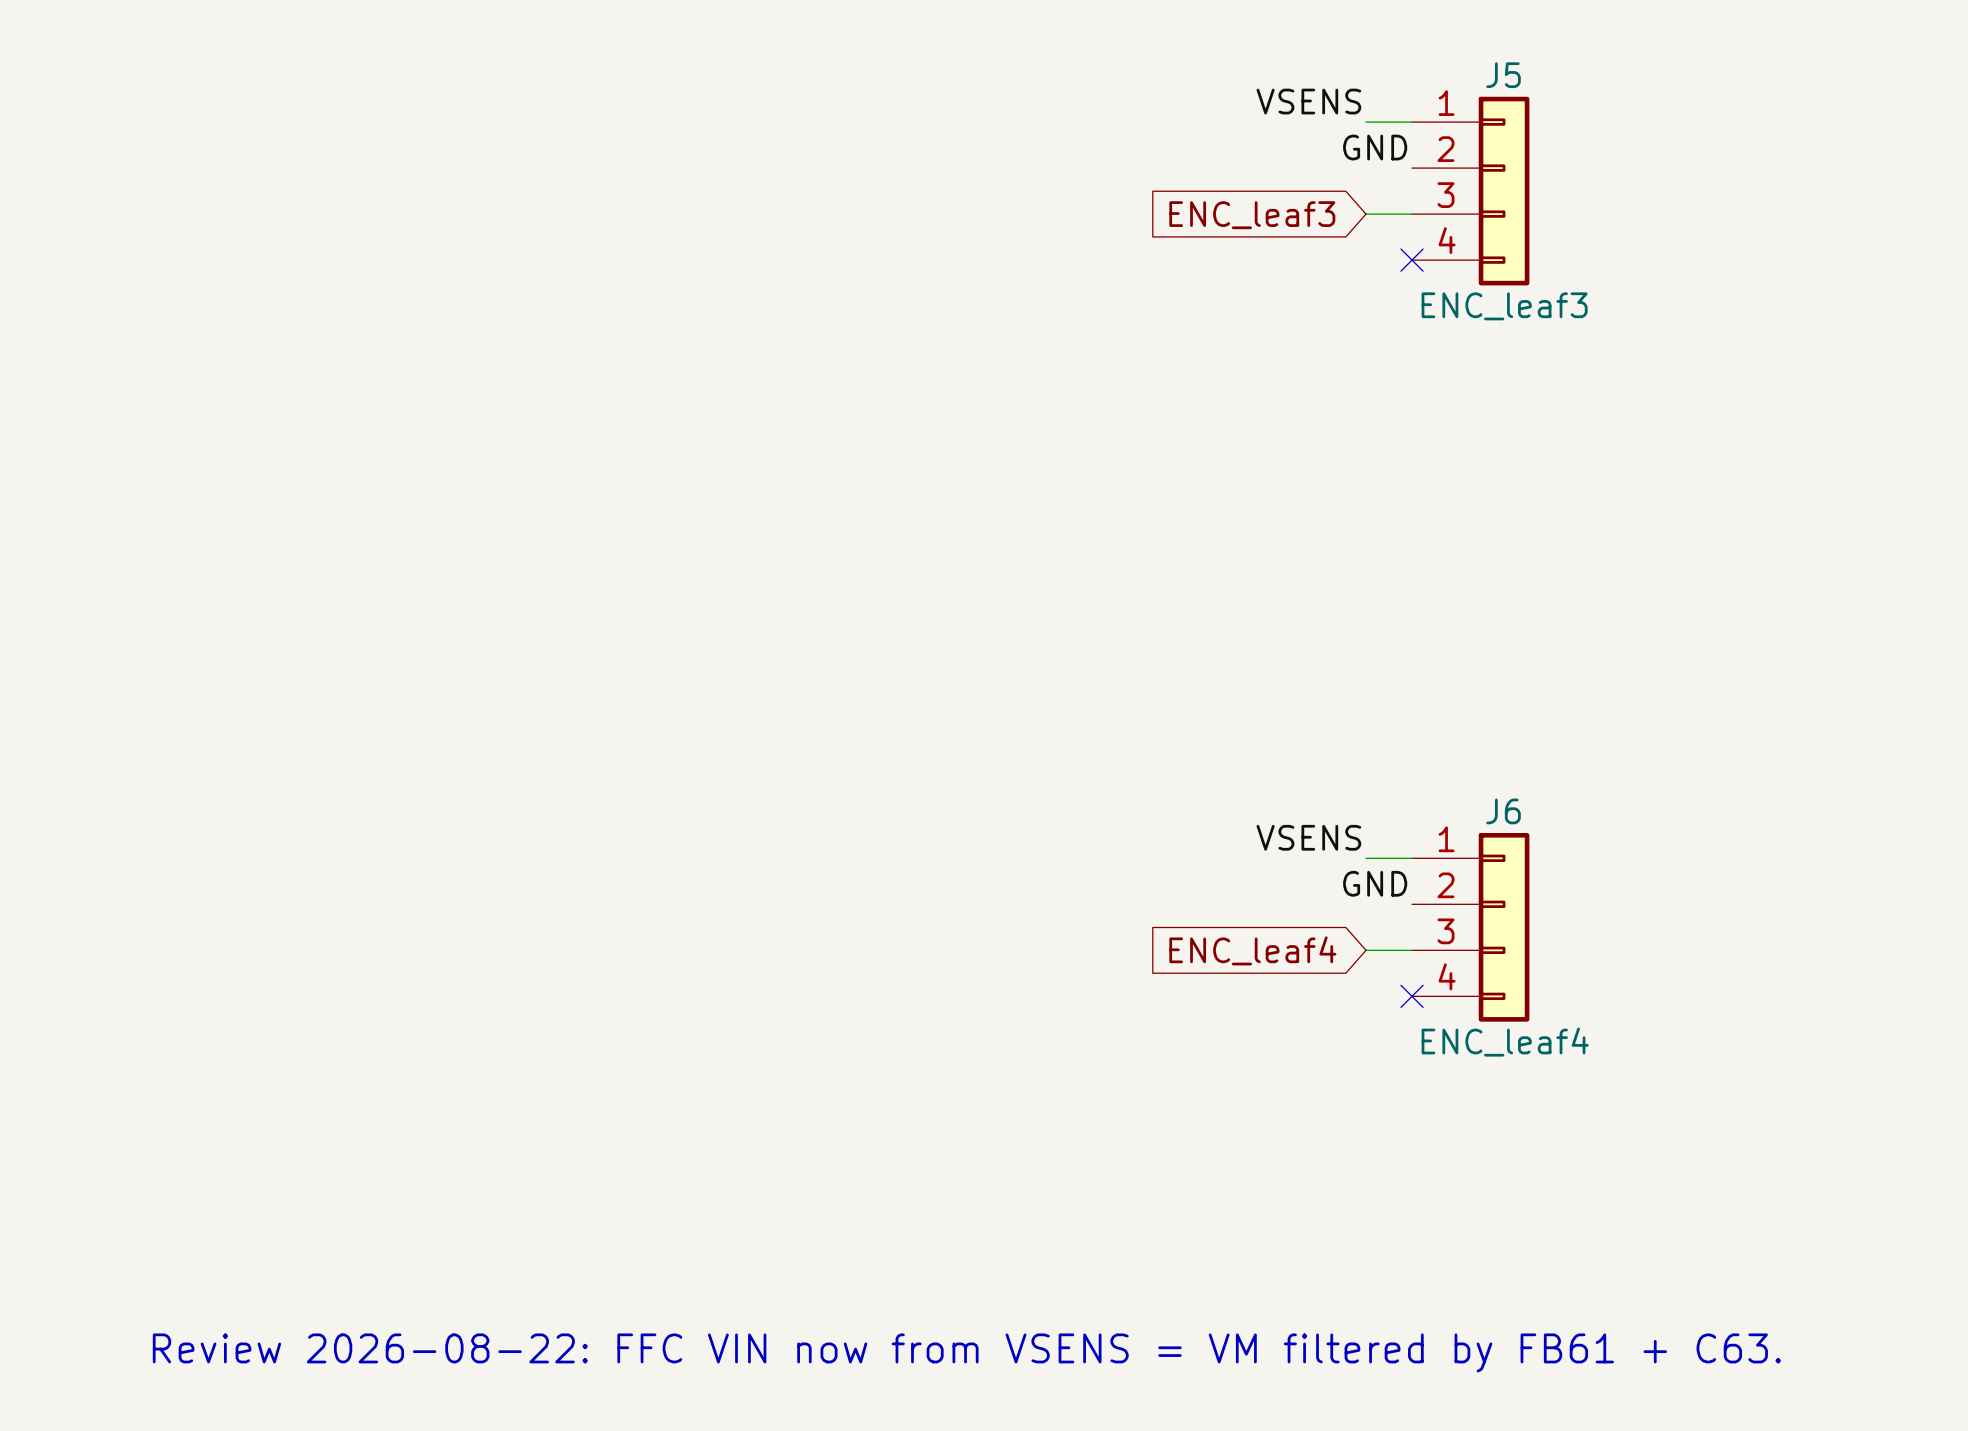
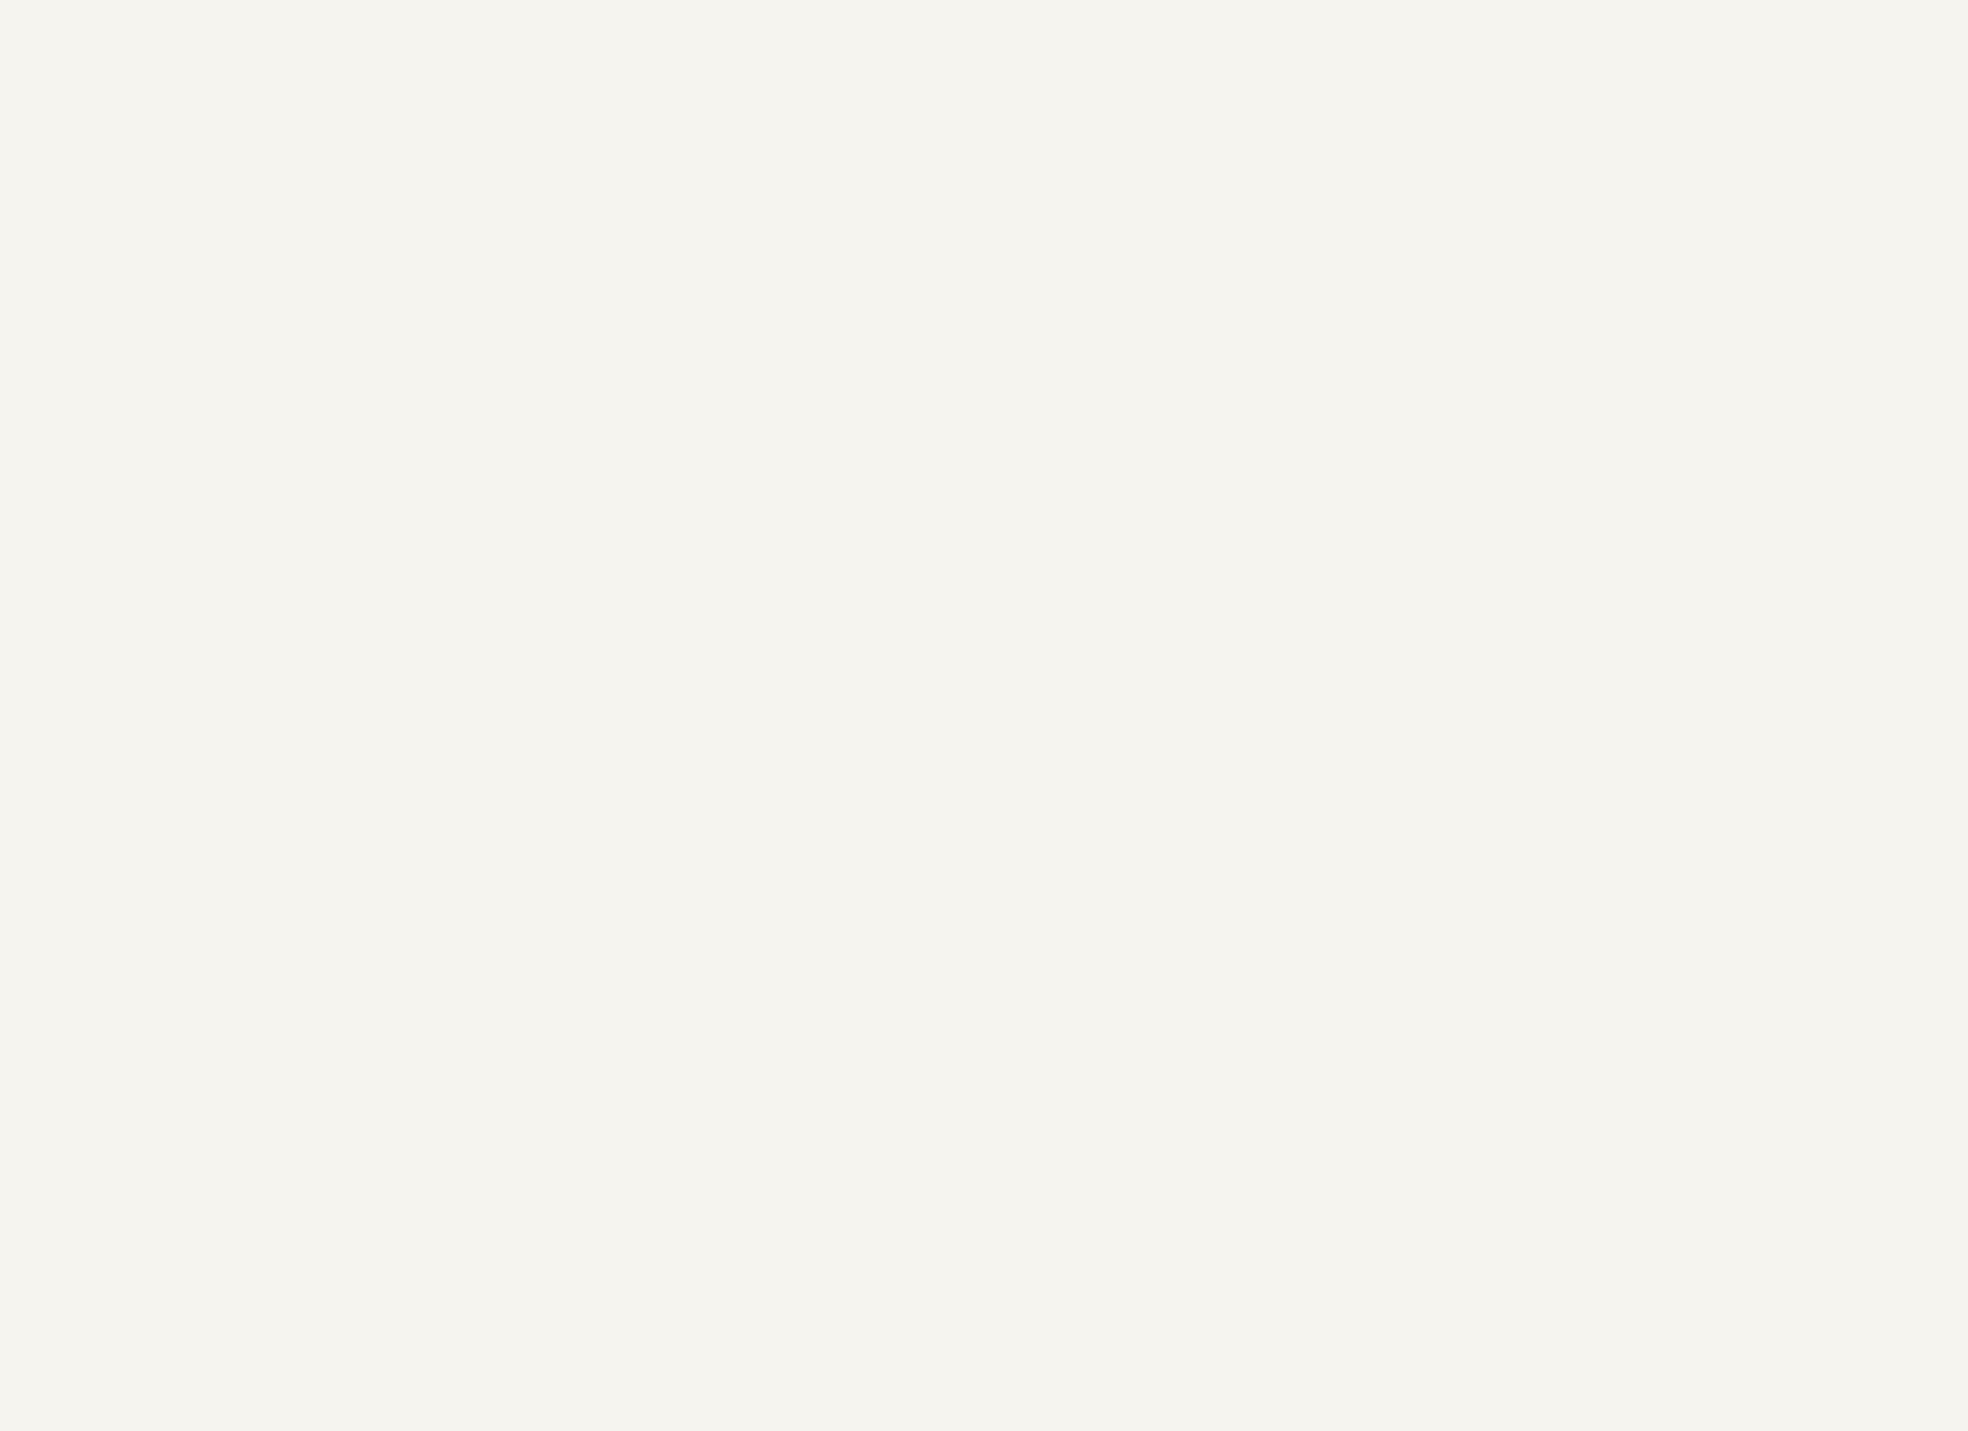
label: VSENS (1308, 101) -> none
wire: (1366, 122) (1412, 122) -> none
label: GND (1375, 147) -> none
J5: ENC_leaf3 (1470, 191) -> none
wire: (1366, 214) (1412, 214) -> none
global label: ENC_leaf3 (1252, 215) -> none
no-connect mark: (1412, 260) -> none
label: VSENS (1308, 837) -> none
wire: (1366, 858) (1412, 858) -> none
label: GND (1375, 883) -> none
J6: ENC_leaf4 (1470, 927) -> none
global label: ENC_leaf4 (1252, 950) -> none
wire: (1366, 950) (1412, 950) -> none
no-connect mark: (1412, 996) -> none
text: Review 2026-08-22: FFC VIN now from VSENS = VM filtered by FB61 + C63. (966, 1352) -> none

